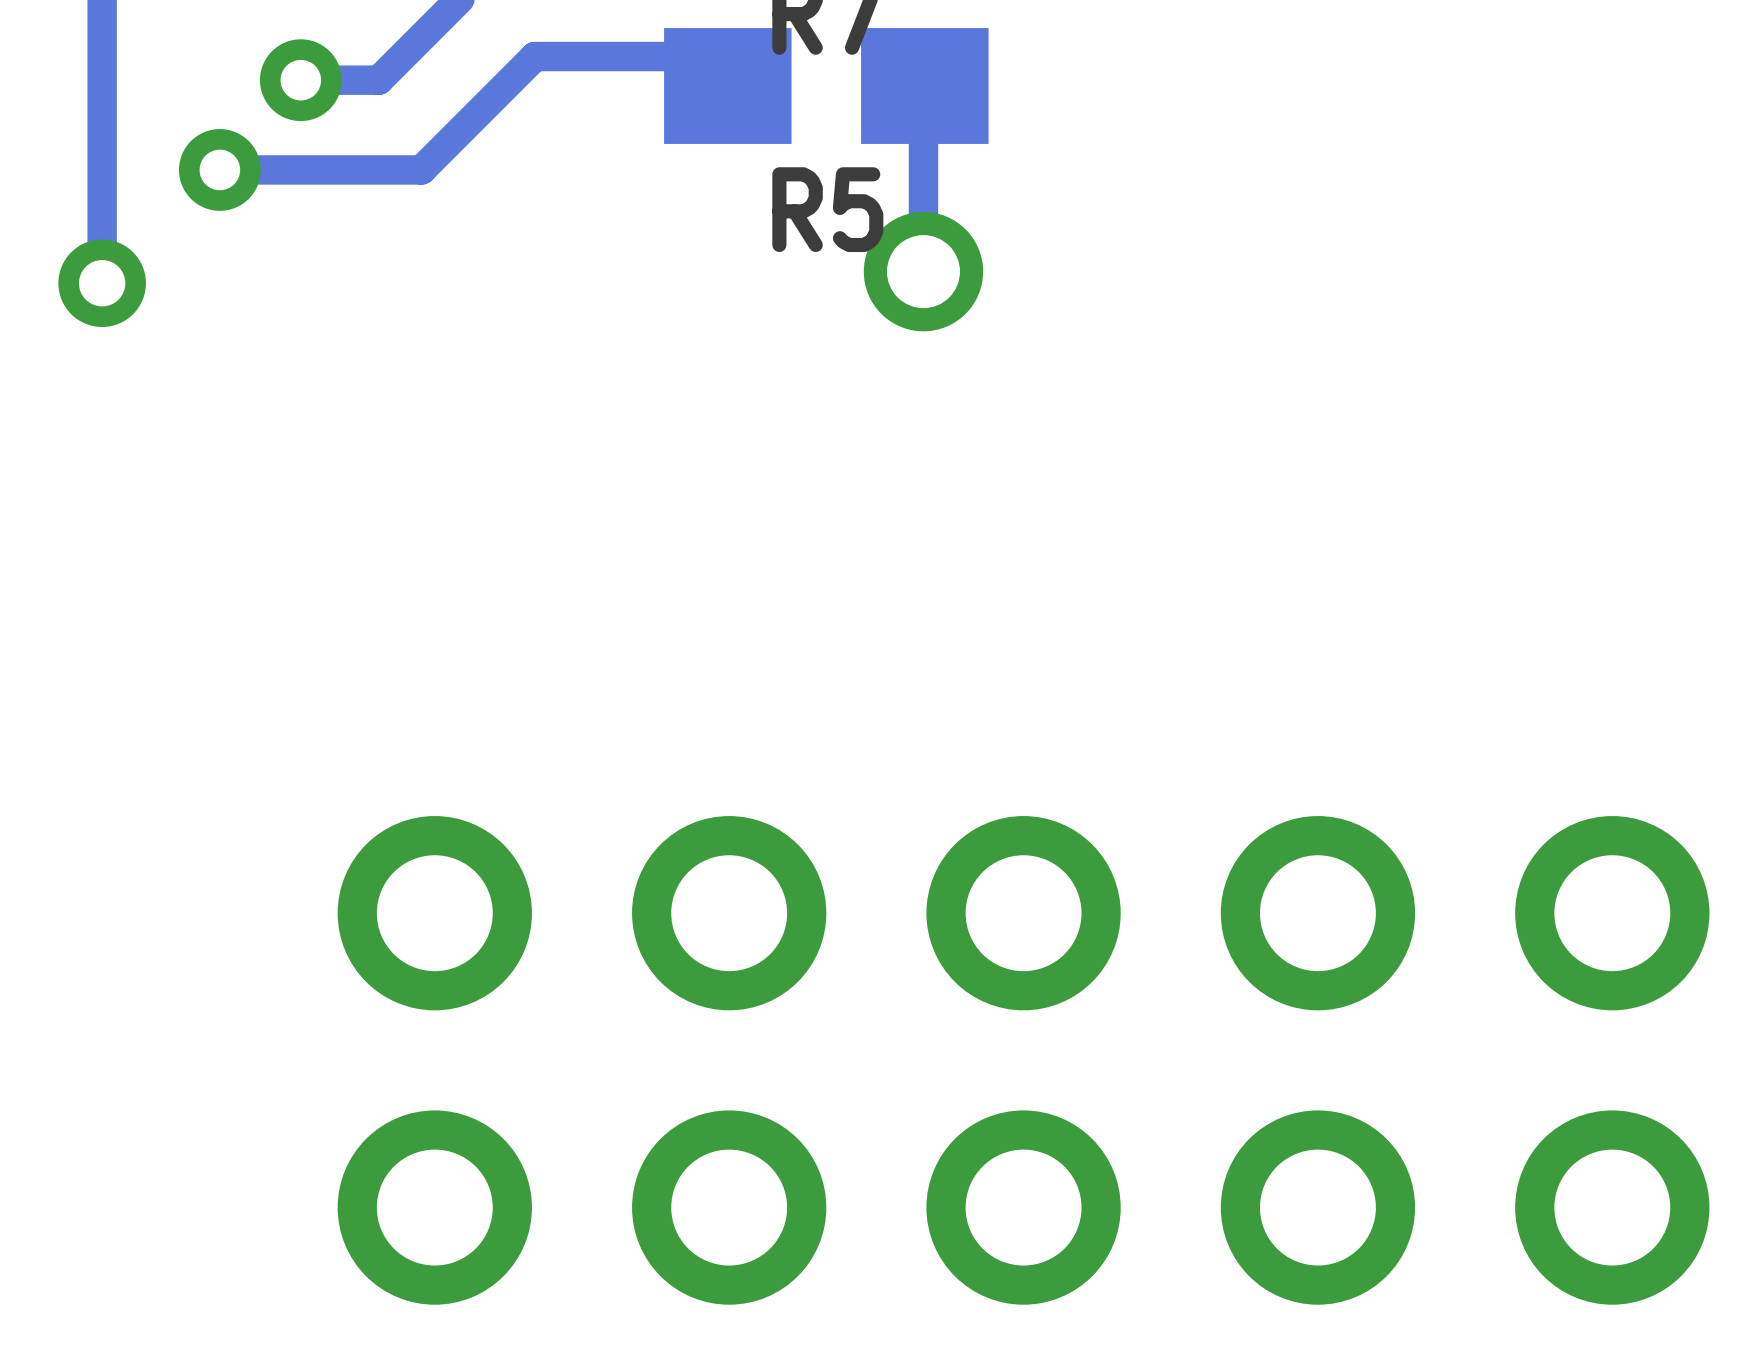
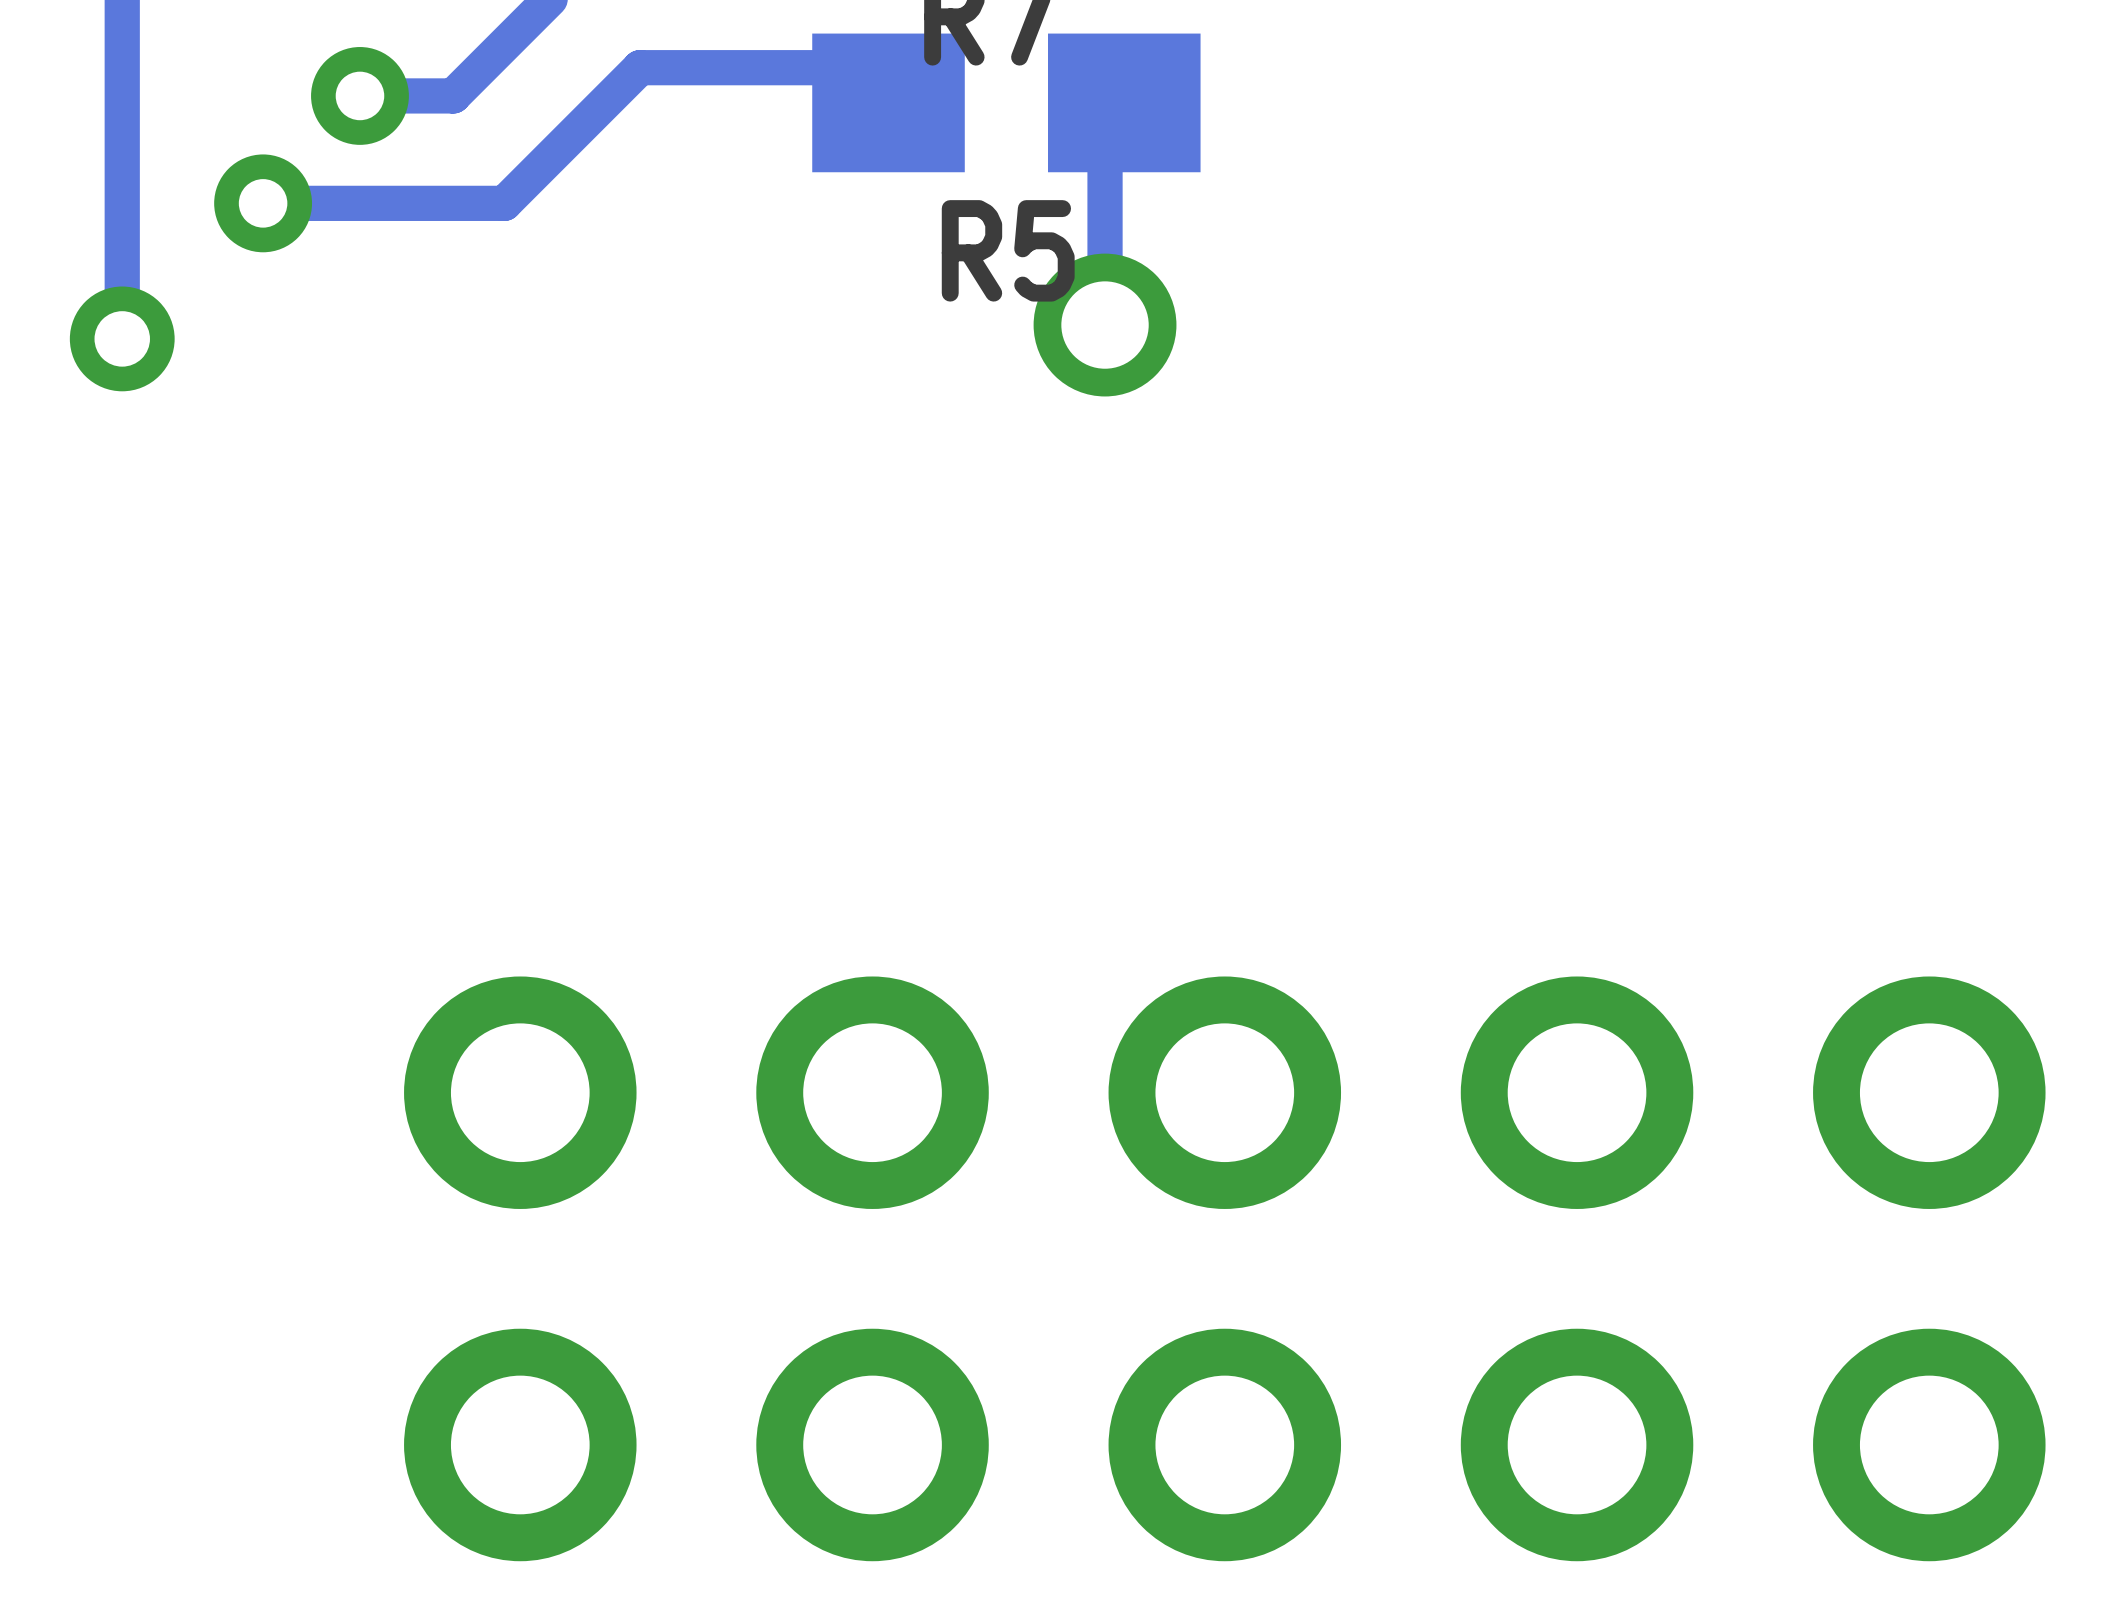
R5 position: (826, 86) -> (1006, 102)

